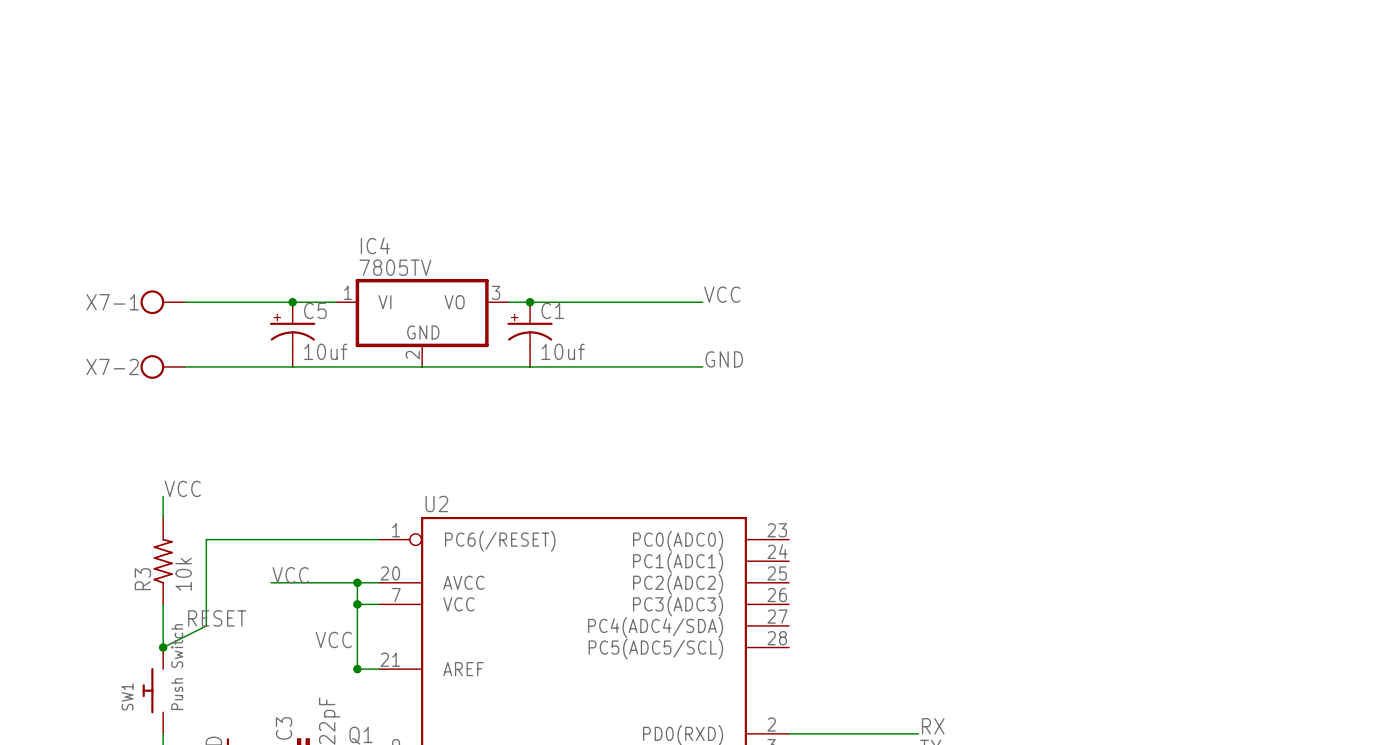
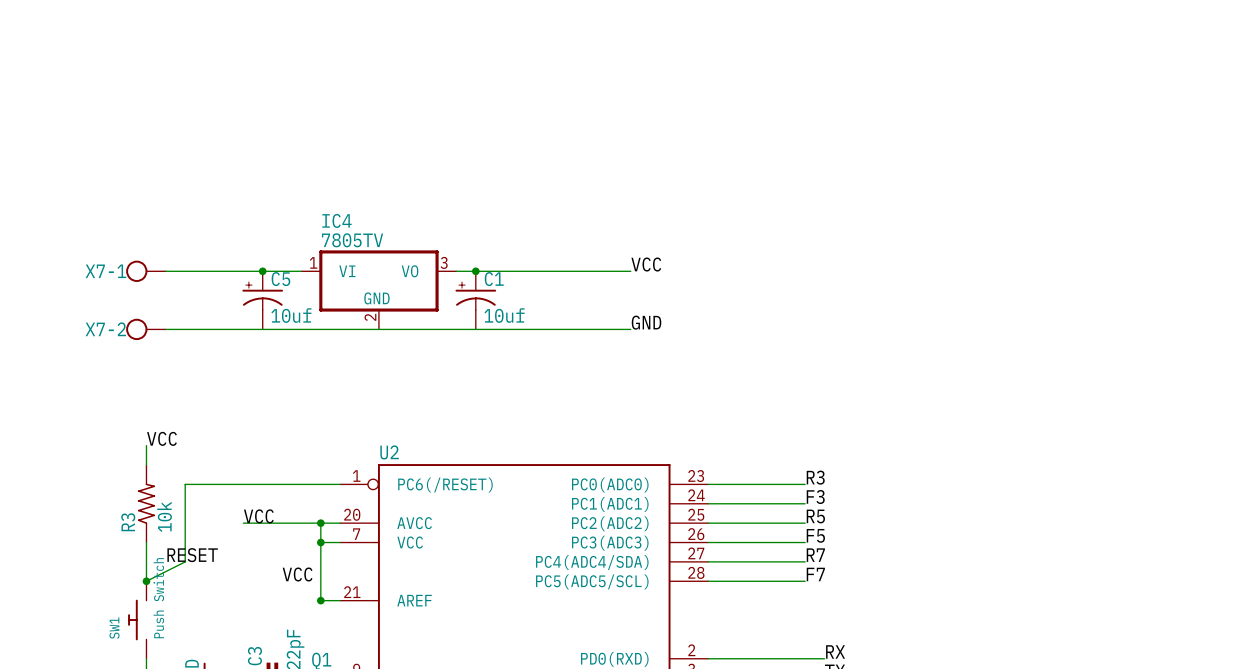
label: none -> R3 (815, 477)
wire: none -> (708, 484) (805, 484)
label: none -> F3 (815, 497)
wire: none -> (708, 503) (805, 503)
label: none -> R5 (815, 516)
wire: none -> (708, 523) (805, 523)
label: none -> F5 (815, 535)
wire: none -> (708, 542) (805, 542)
label: none -> R7 (815, 555)
wire: none -> (708, 561) (805, 561)
label: none -> F7 (815, 574)
wire: none -> (708, 581) (805, 581)

